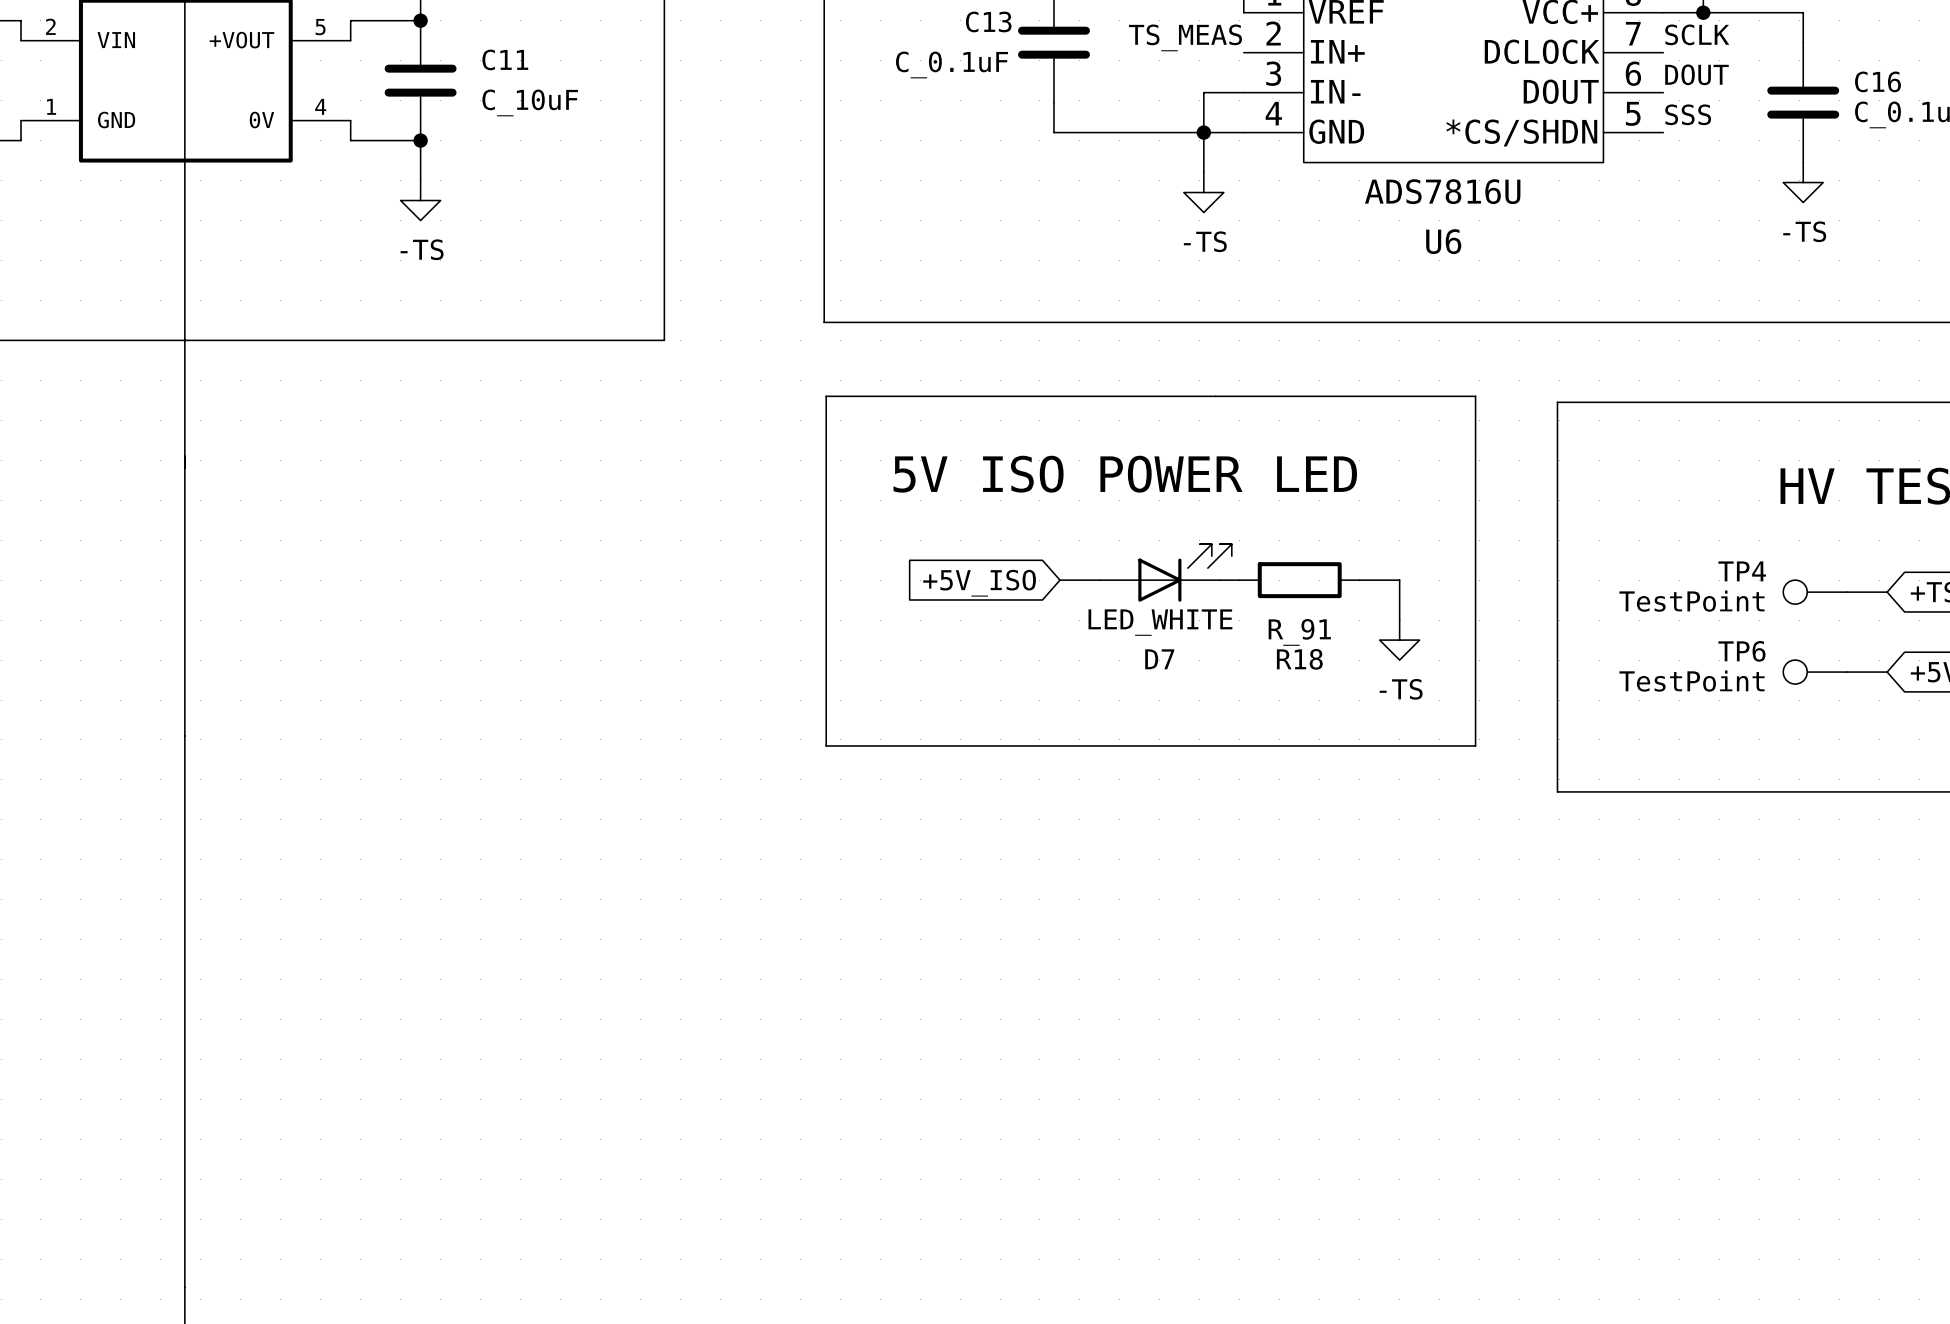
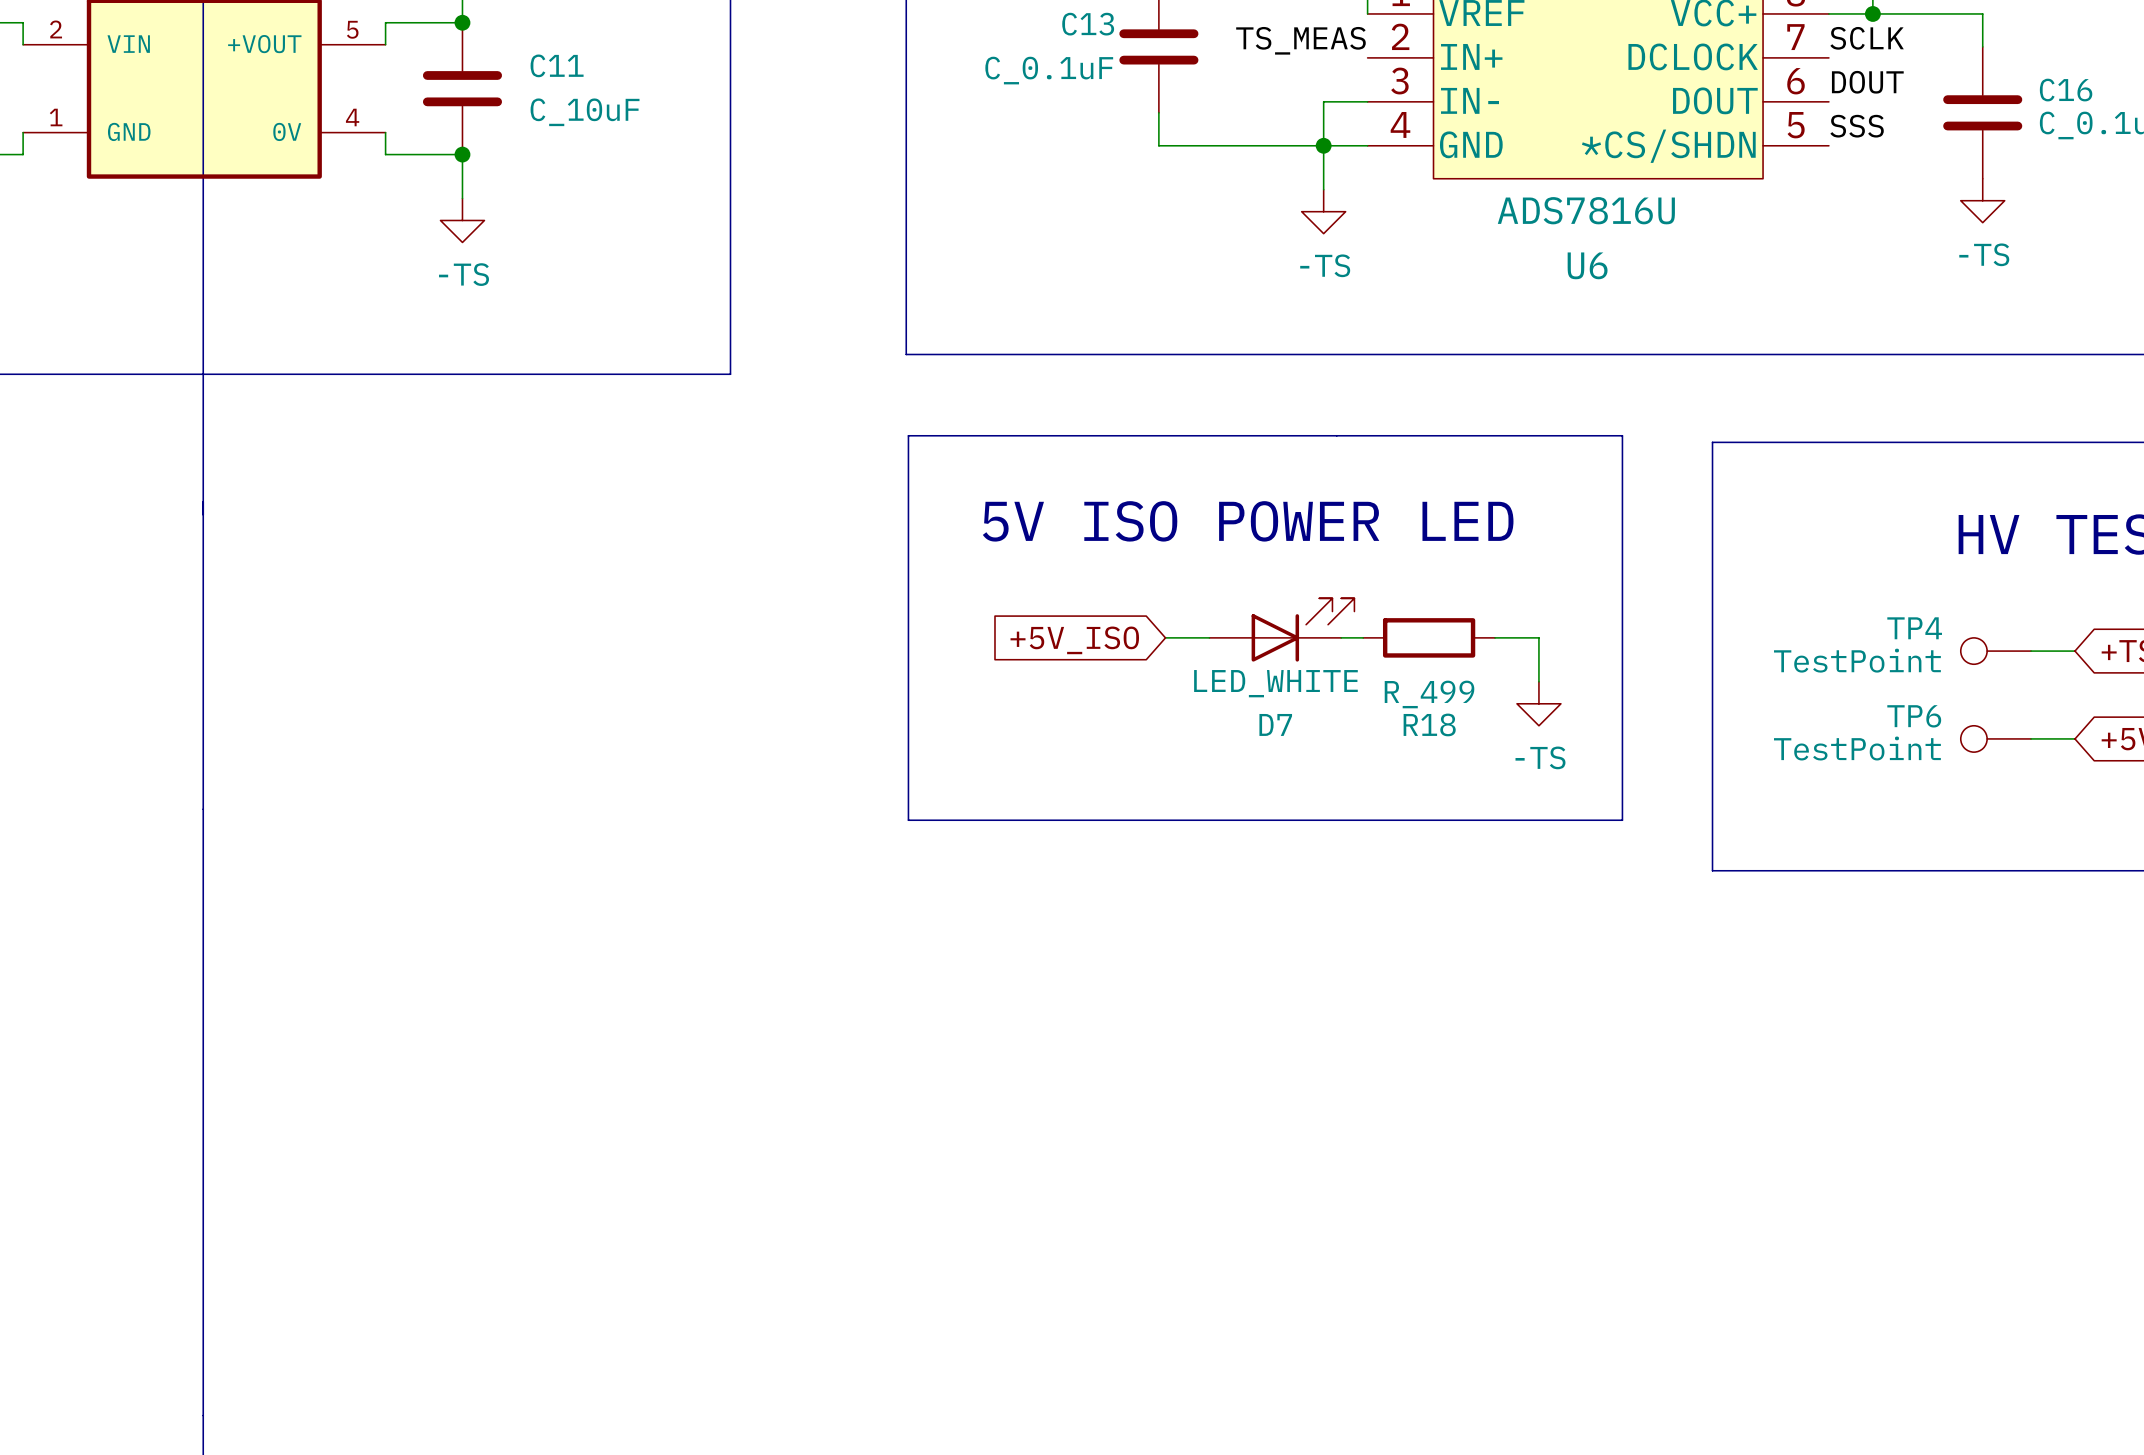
R18 value: R_91 (1299, 632) -> R_499 (1429, 694)

